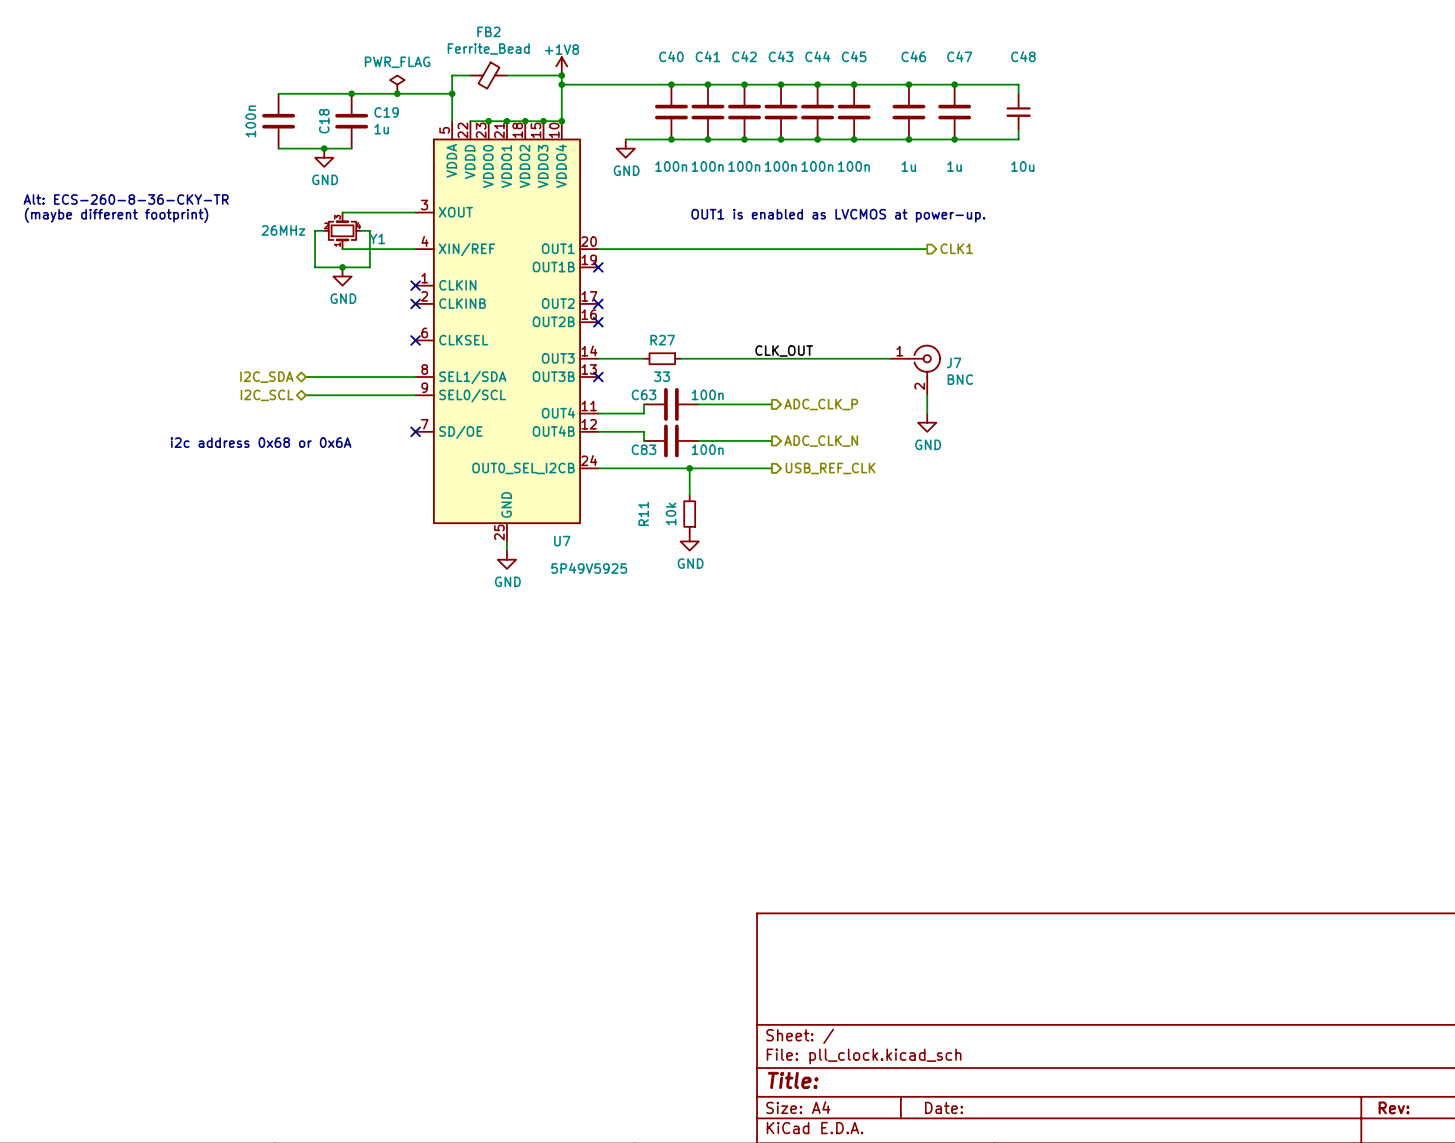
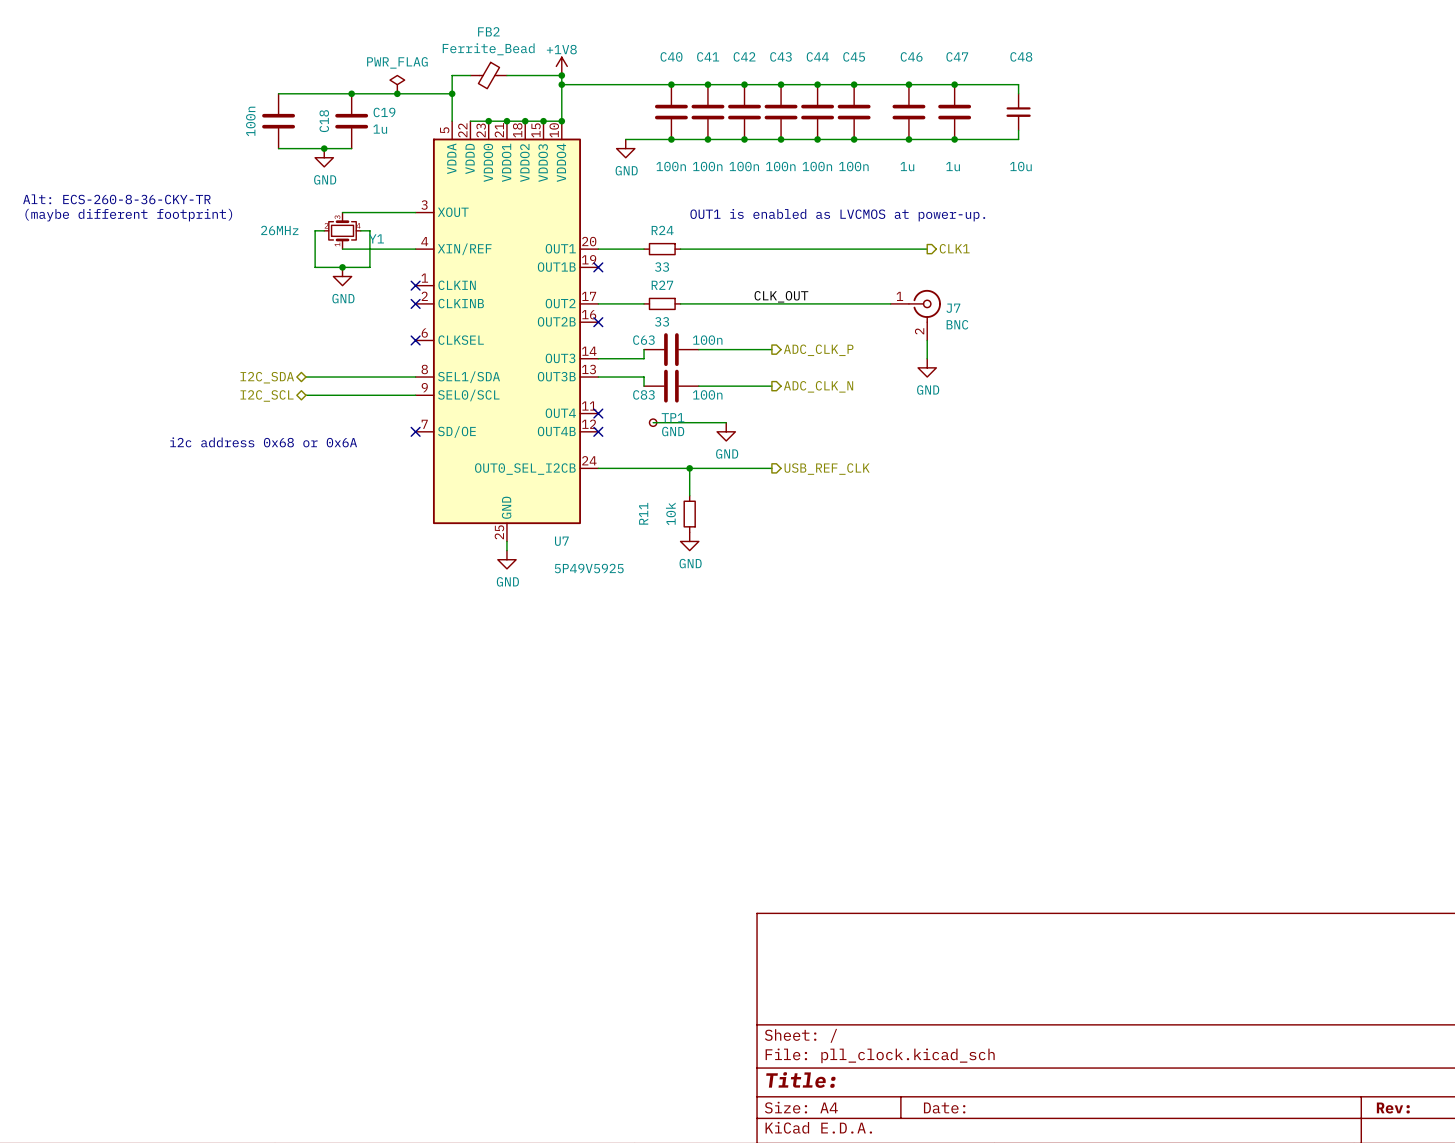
wire: (644, 249) (680, 249) -> none
R24: none -> 33 (662, 249)
wire: none -> (598, 303) (644, 303)
no-connect mark: (598, 303) -> none
wire: none -> (644, 349) (644, 358)
label position: CLK_OUT (784, 351) -> CLK_OUT (781, 296)
R27 position: (662, 358) -> (662, 303)
wire: (680, 358) (890, 358) -> (680, 303) (890, 303)
J7 position: (915, 369) -> (915, 315)
no-connect mark: (598, 377) -> none
wire: (927, 395) (927, 413) -> (927, 340) (927, 358)
wire: (644, 404) (644, 413) (598, 413) -> none
C63 position: (671, 404) -> (671, 349)
wire: (698, 404) (771, 404) -> (698, 349) (771, 349)
hierarchical label position: ADC_CLK_P (821, 404) -> ADC_CLK_P (818, 350)
no-connect mark: none -> (598, 413)
wire: none -> (653, 422) (726, 422)
TP1: none -> GND (653, 422)
power symbol position: GND (927, 422) -> GND (927, 367)
wire: (598, 431) (644, 431) (644, 440) -> (598, 377) (644, 377) (644, 386)
no-connect mark: none -> (598, 431)
power symbol: none -> GND (726, 431)
C83 position: (671, 440) -> (671, 386)
wire: (698, 440) (771, 440) -> (698, 386) (771, 386)
hierarchical label position: ADC_CLK_N (821, 441) -> ADC_CLK_N (818, 386)

